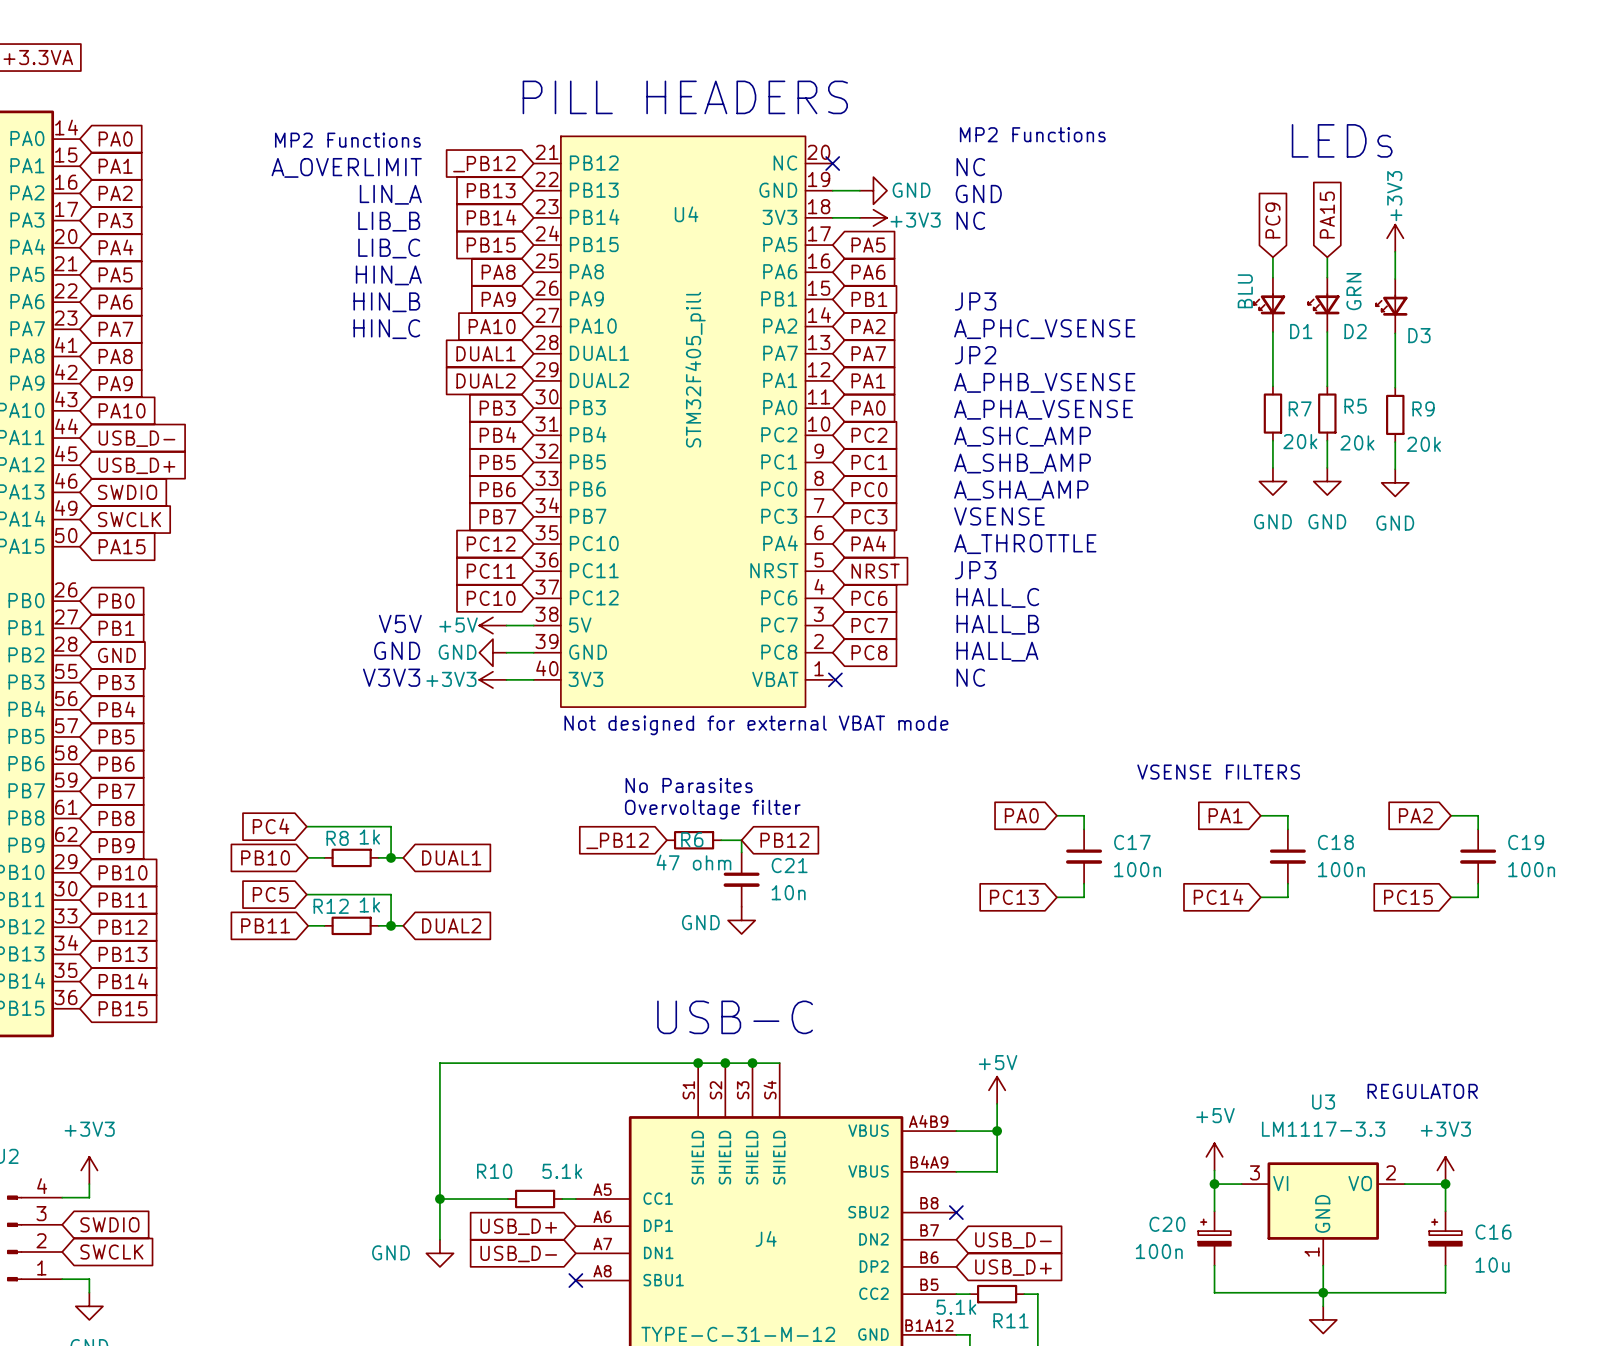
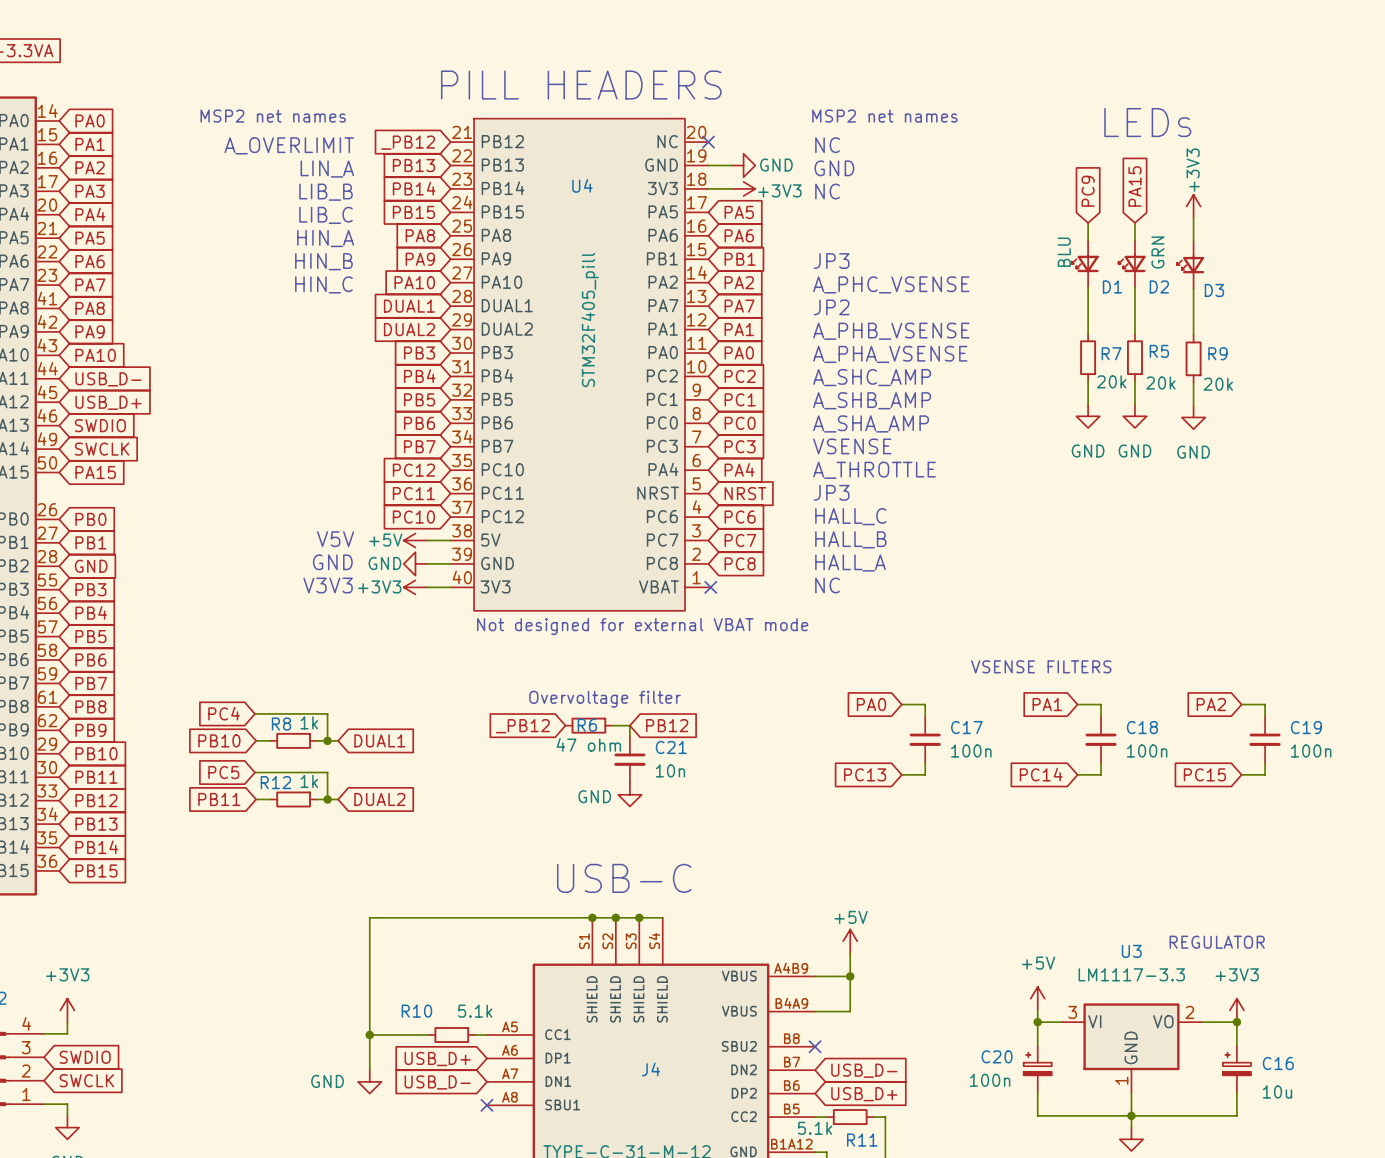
text: none -> MSP2 net names (273, 116)
text: MP2 Functions (1032, 134) -> MSP2 net names (884, 116)
text: MP2 Functions (347, 140) -> none
text: No Parasites (689, 785) -> none

